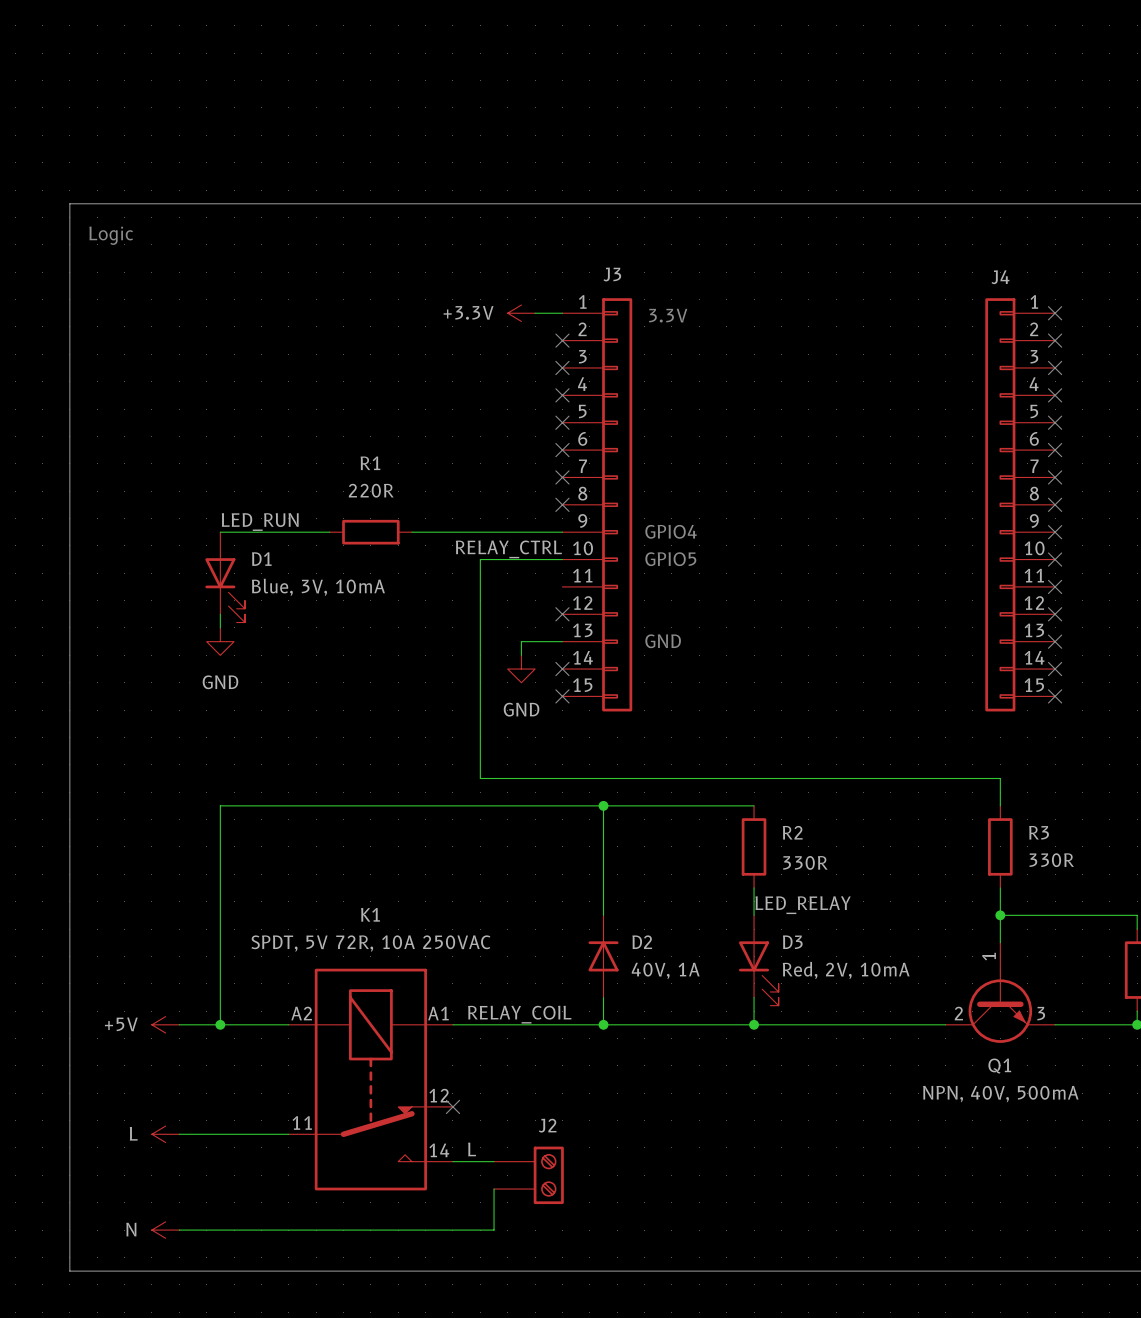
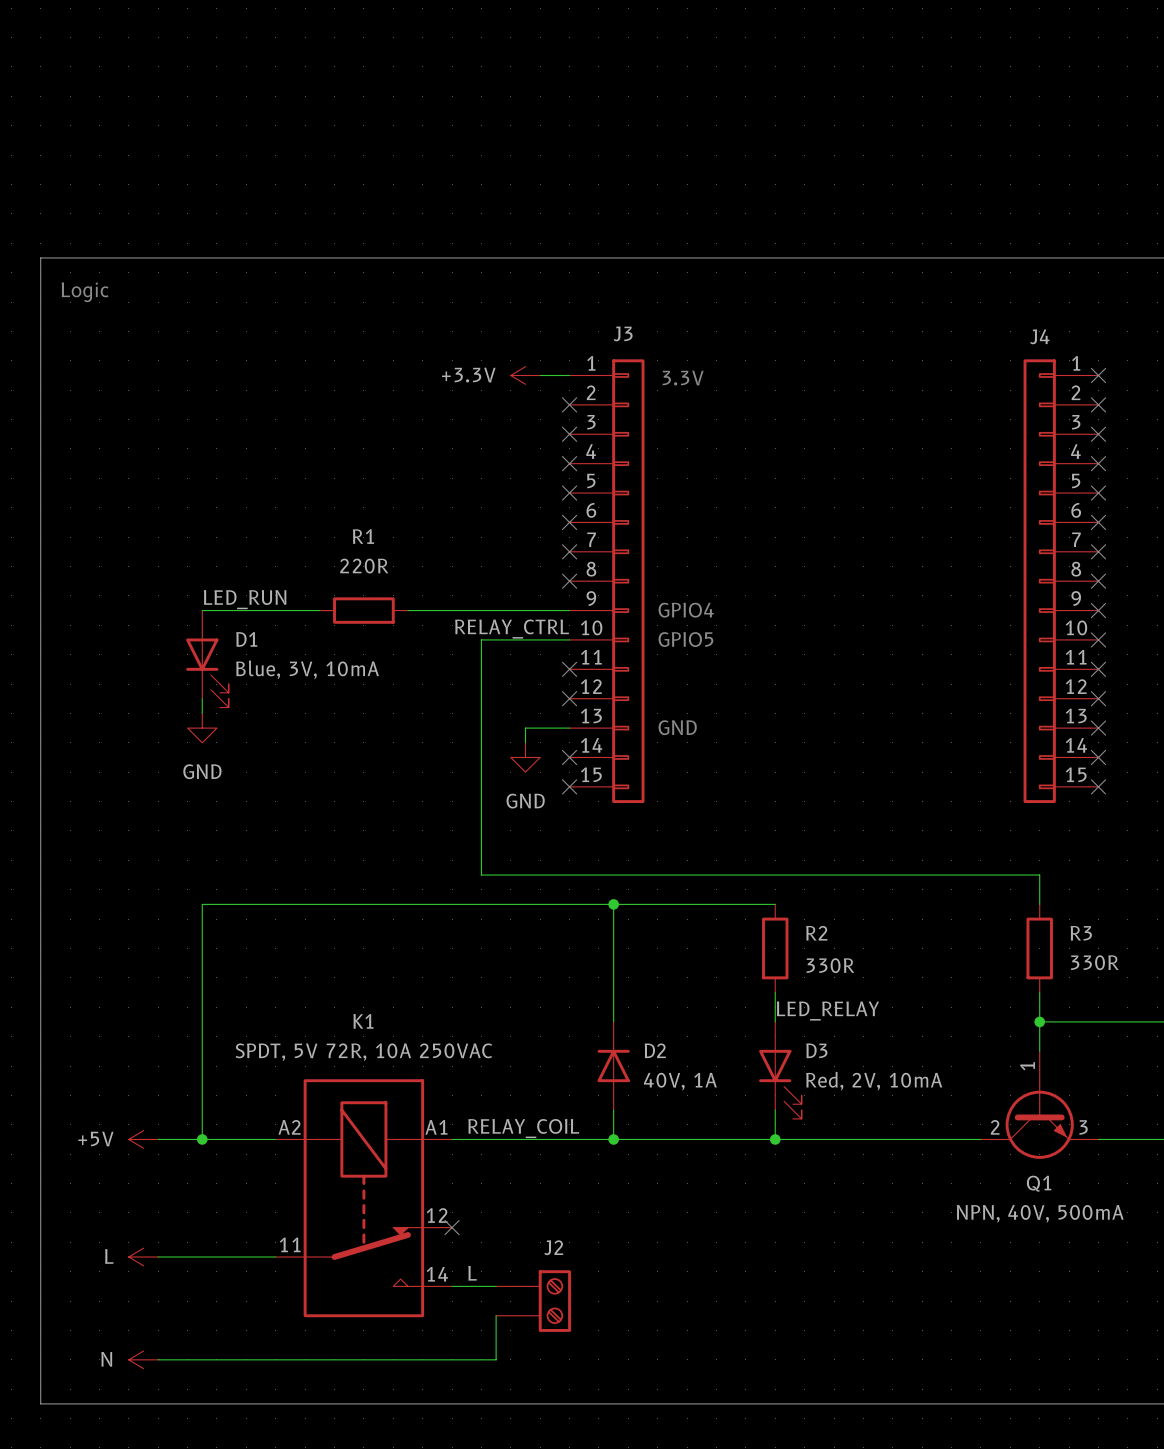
no-connect mark: none -> (569, 669)

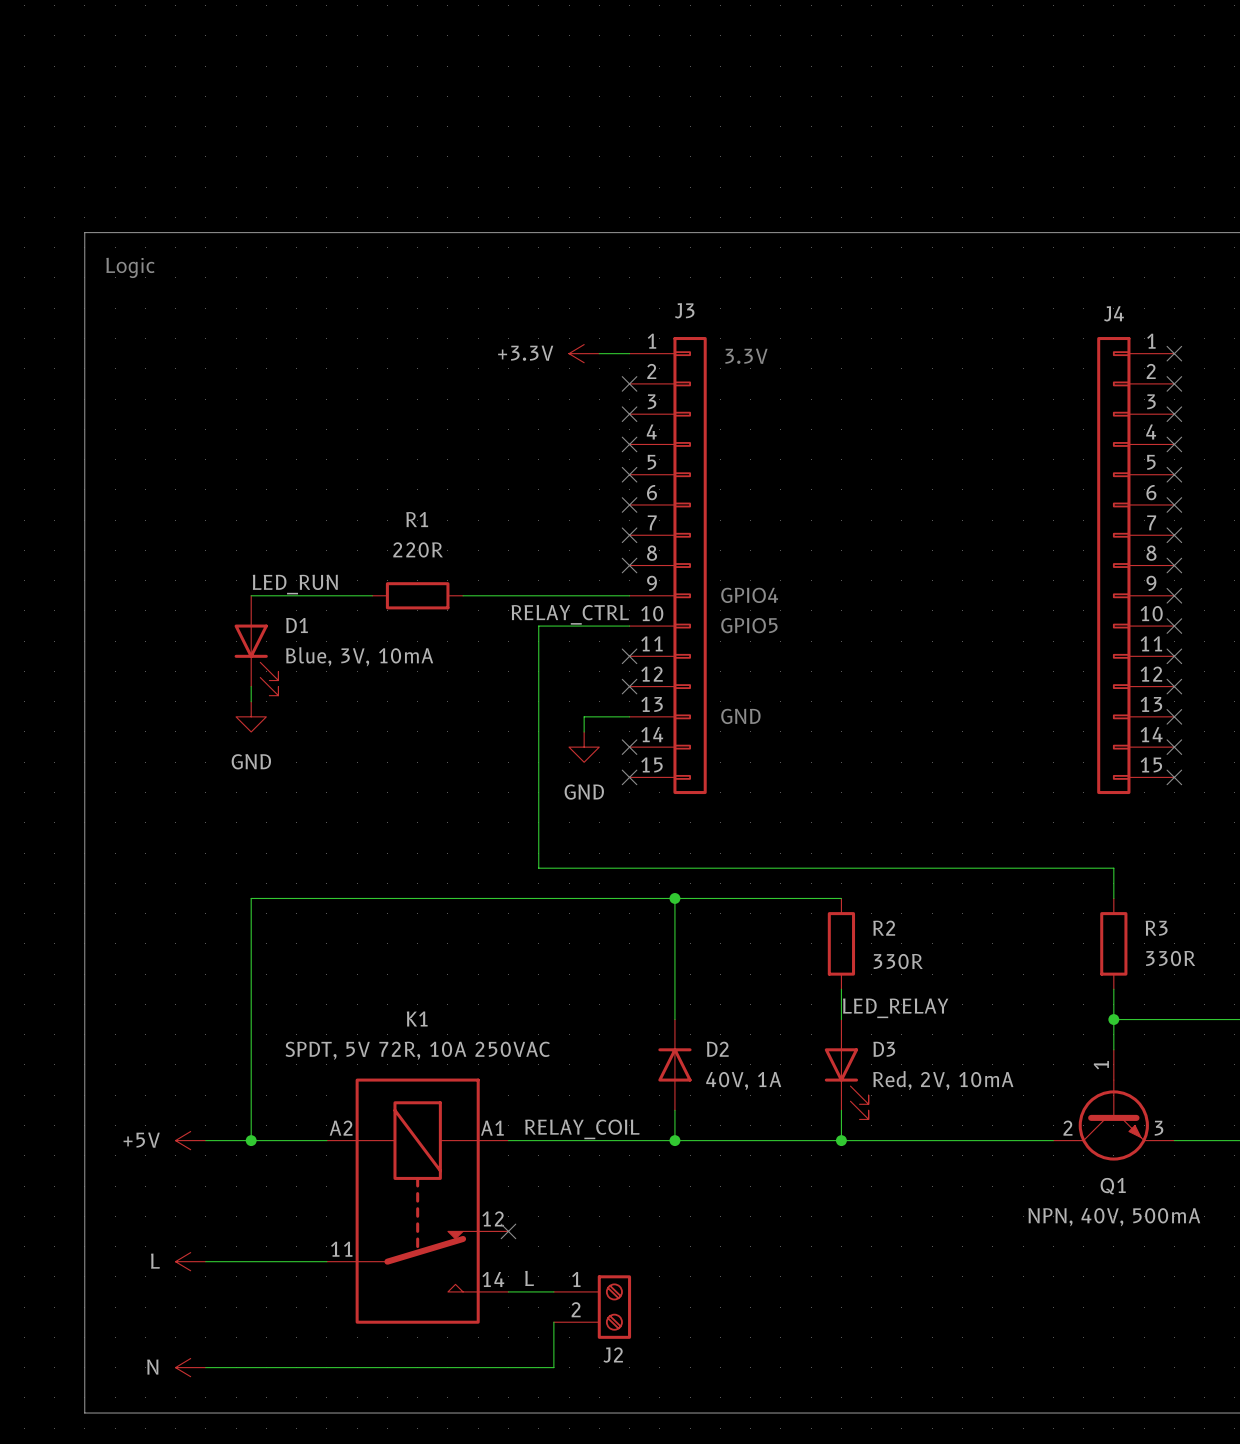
J2 name position: J2 (553, 1247) -> J2 (613, 1355)
J2 pin number: none -> 1 (576, 1279)
J2 pin number: none -> 2 (576, 1309)

